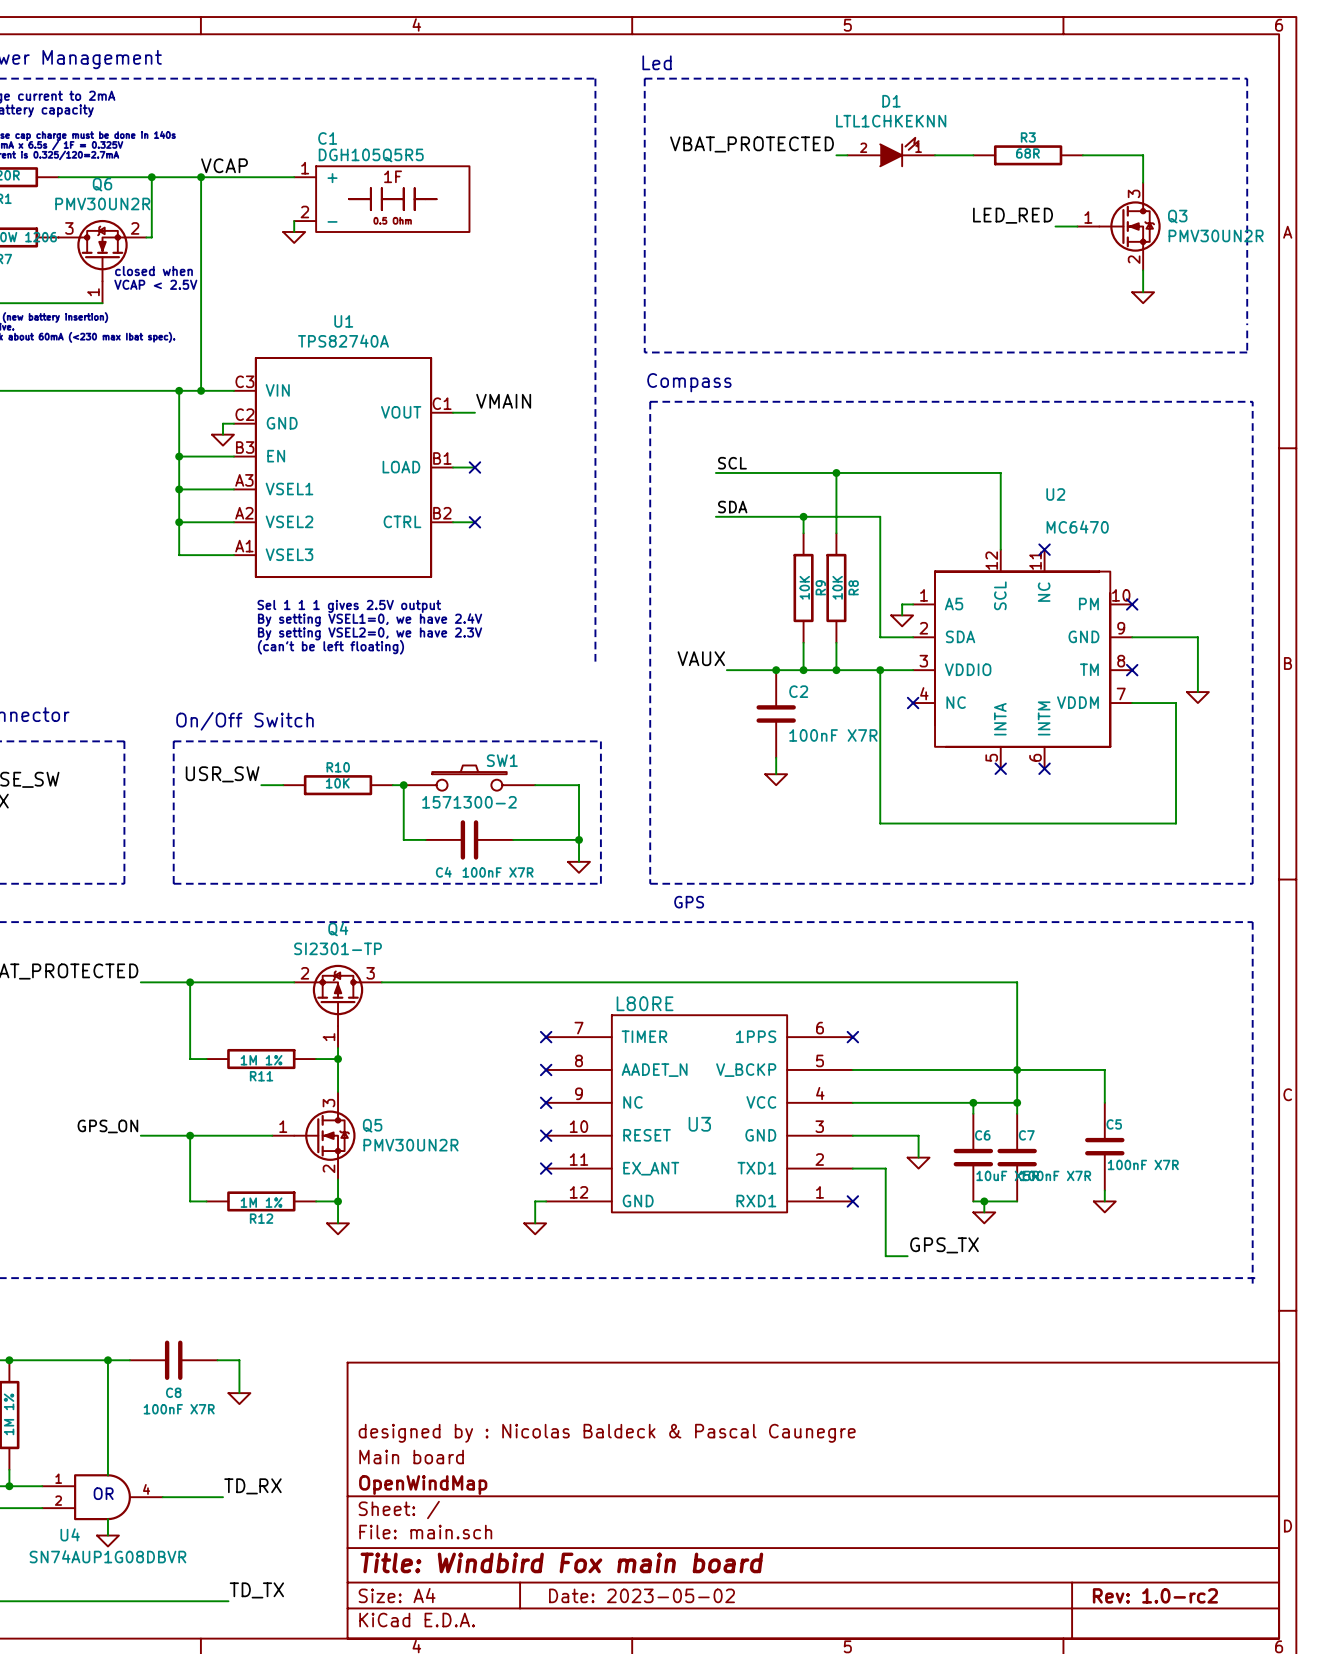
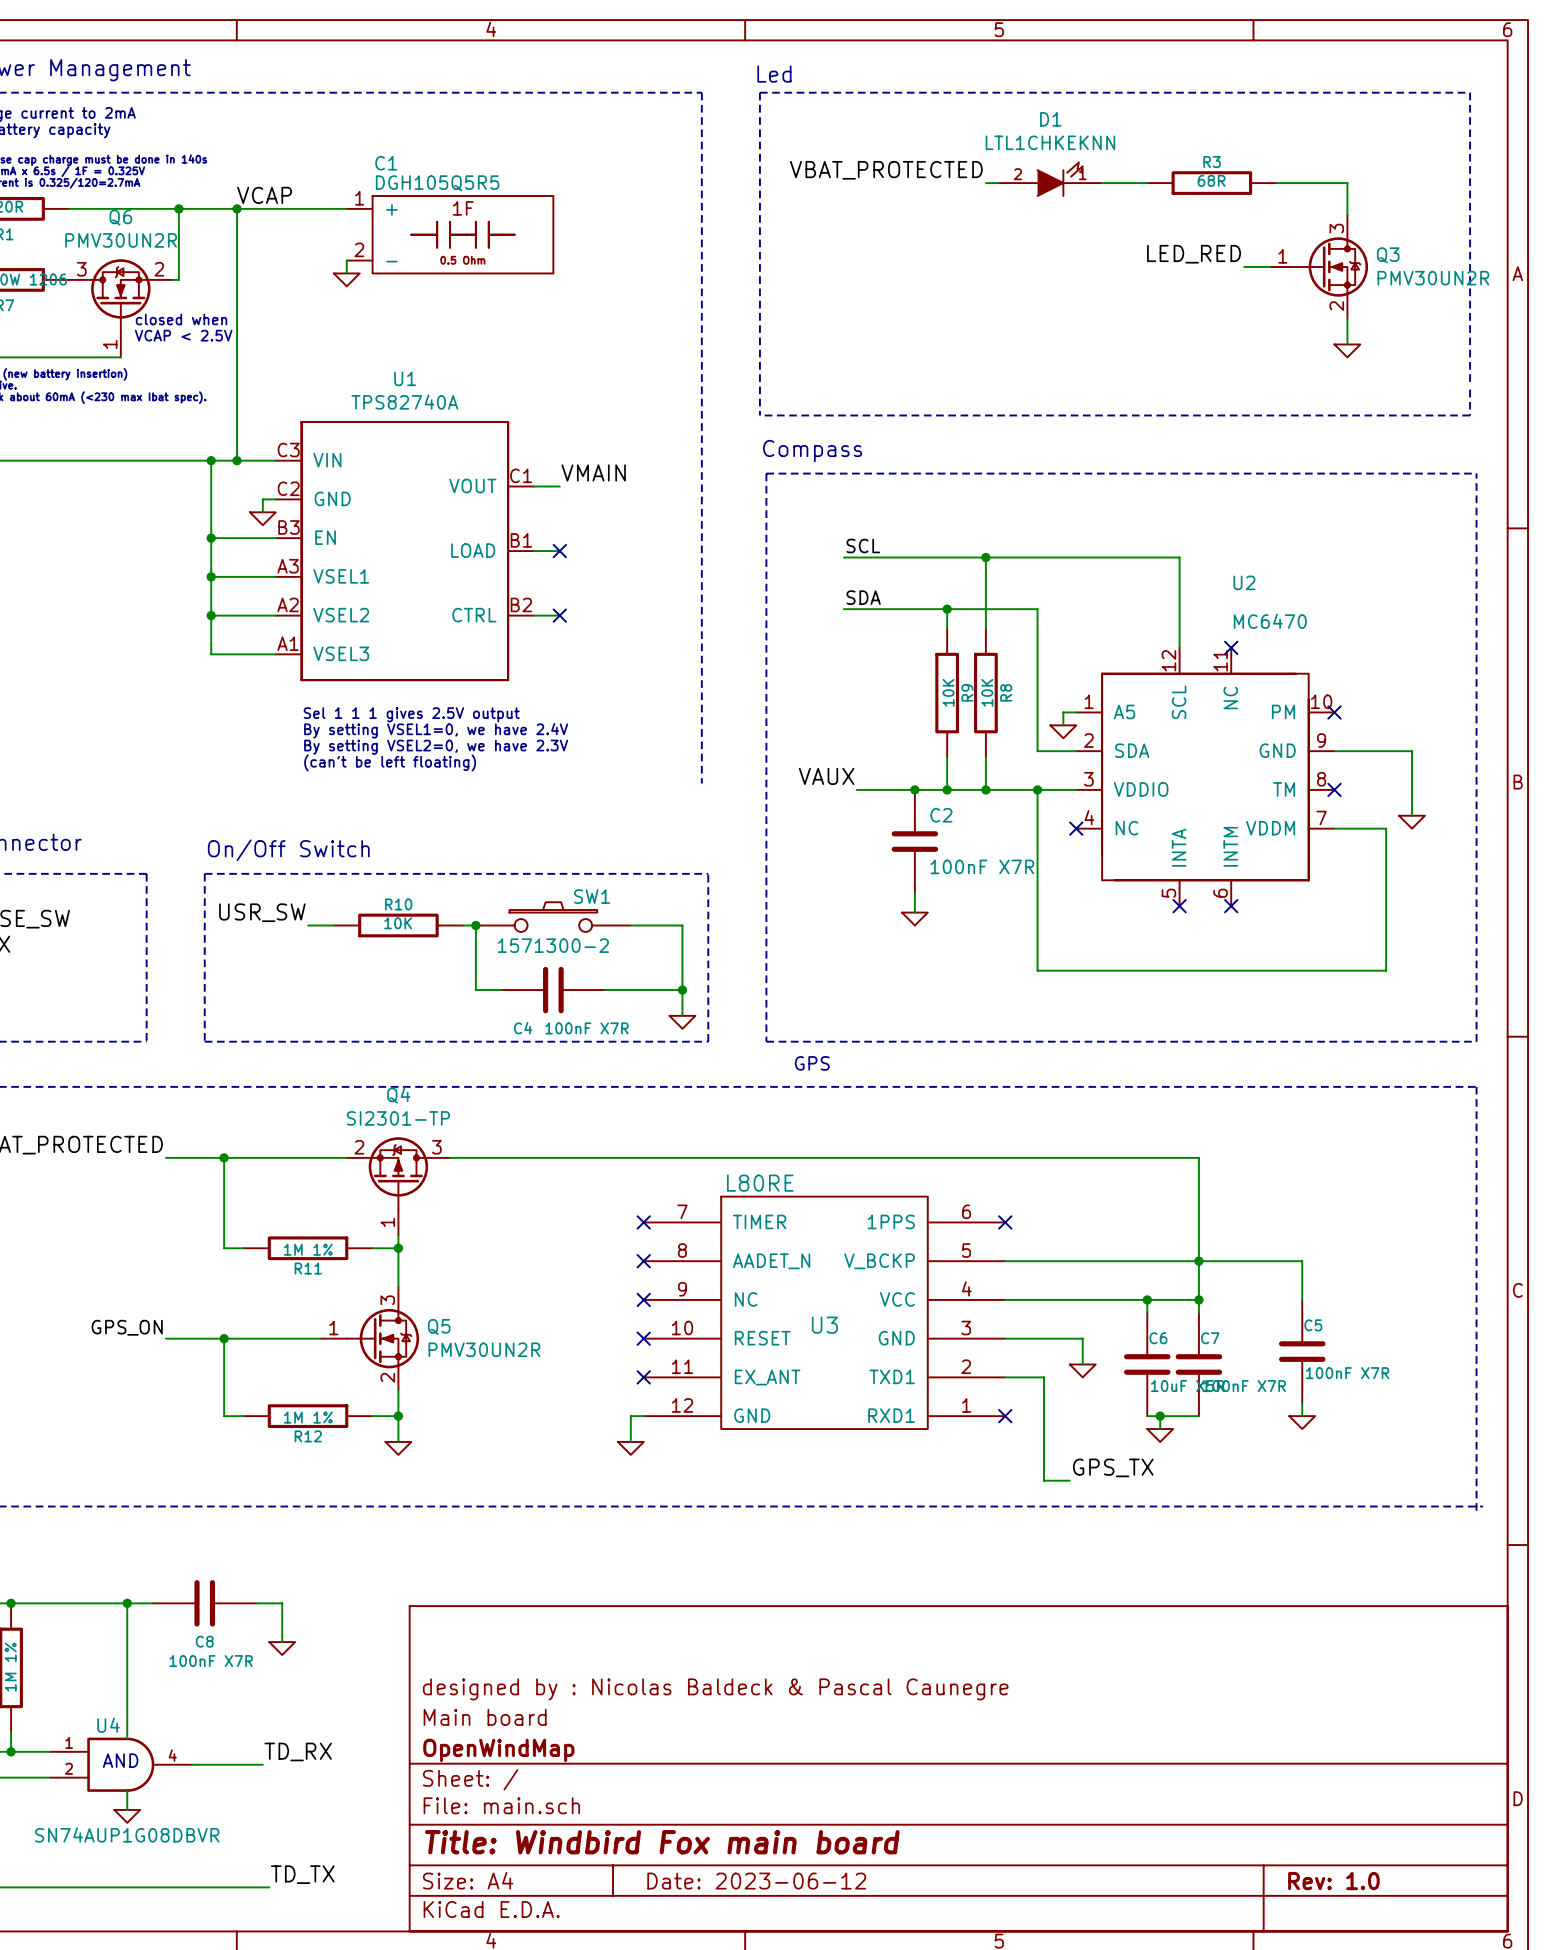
text: OR (103, 1493) -> AND (120, 1760)
U4 name position: U4 (70, 1534) -> U4 (108, 1725)
title block: Date: 2023-05-02 (642, 1595) -> Date: 2023-06-12 (756, 1881)
title block: Rev: 1.0-rc2 (1155, 1595) -> Rev: 1.0 (1333, 1881)

